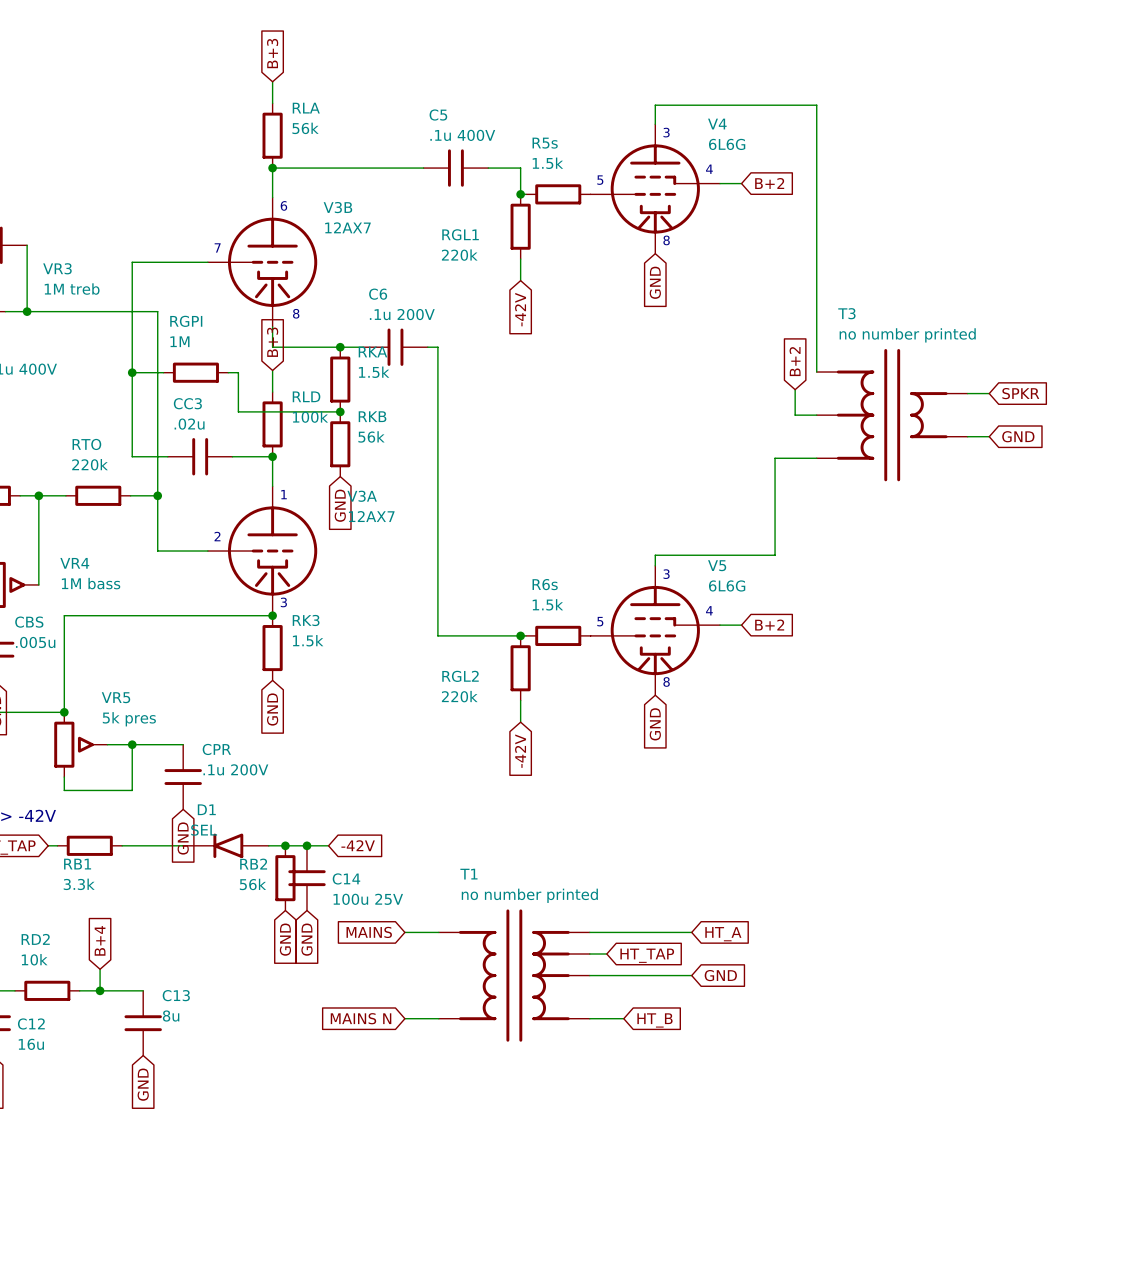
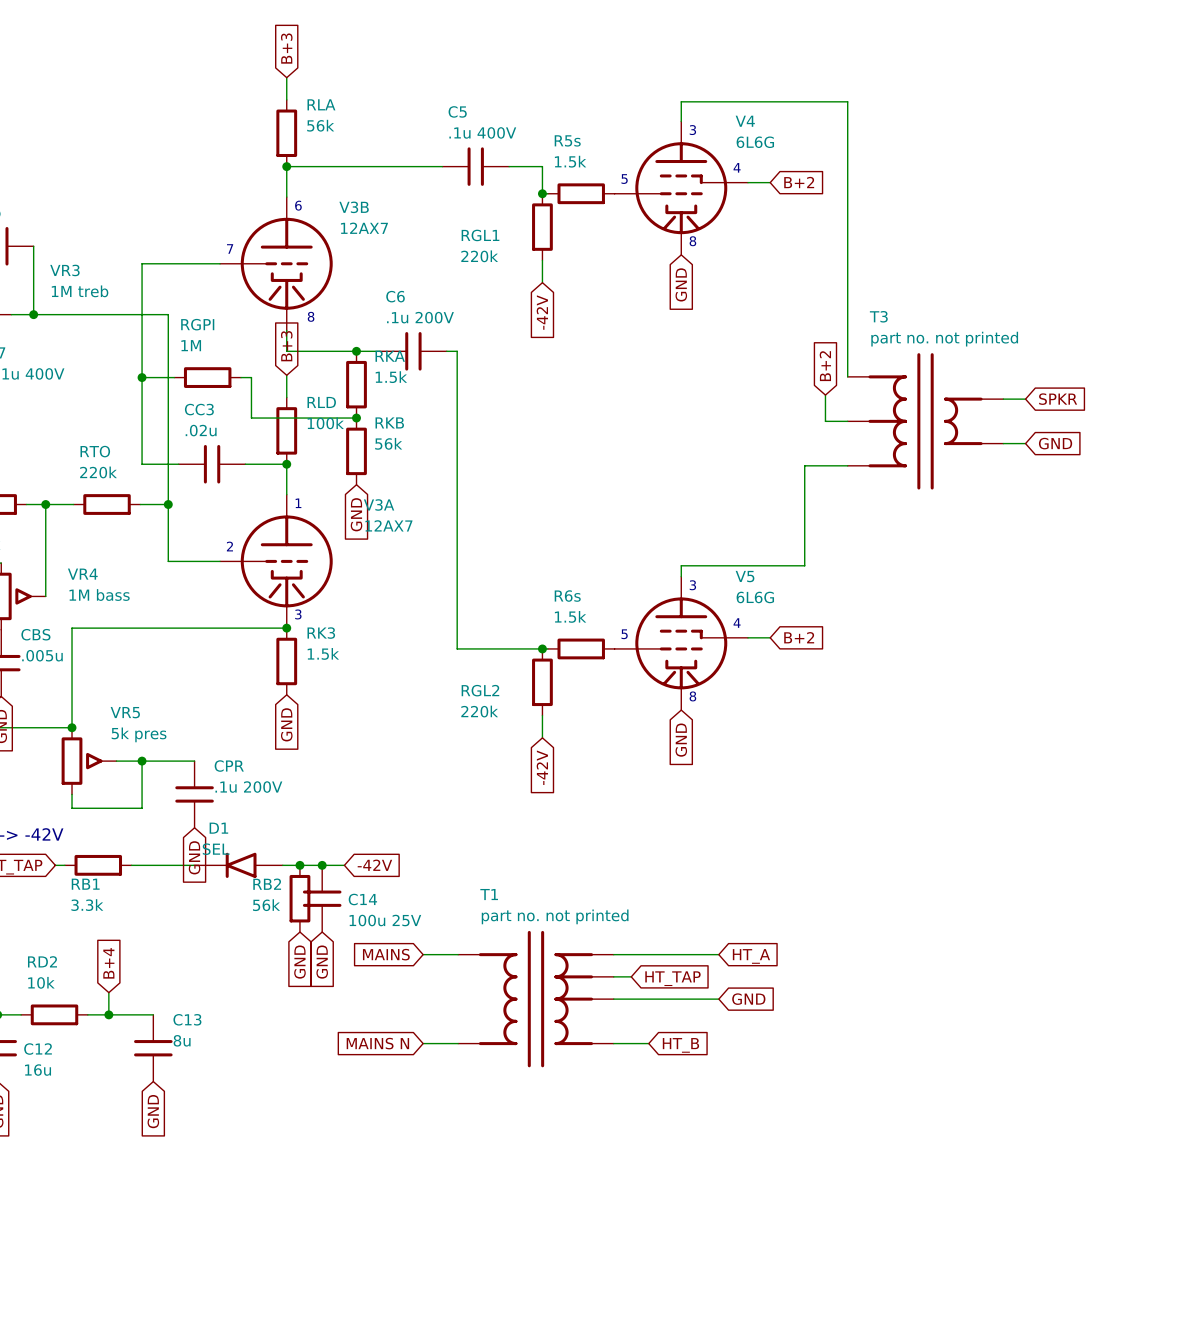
T3 value: no number printed (907, 335) -> part no. not printed (944, 339)
T1 value: no number printed (529, 895) -> part no. not printed (555, 916)

